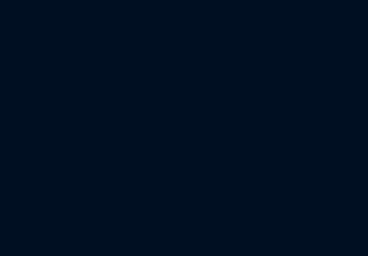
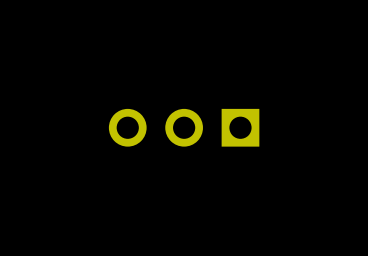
part: none -> (184, 127)

